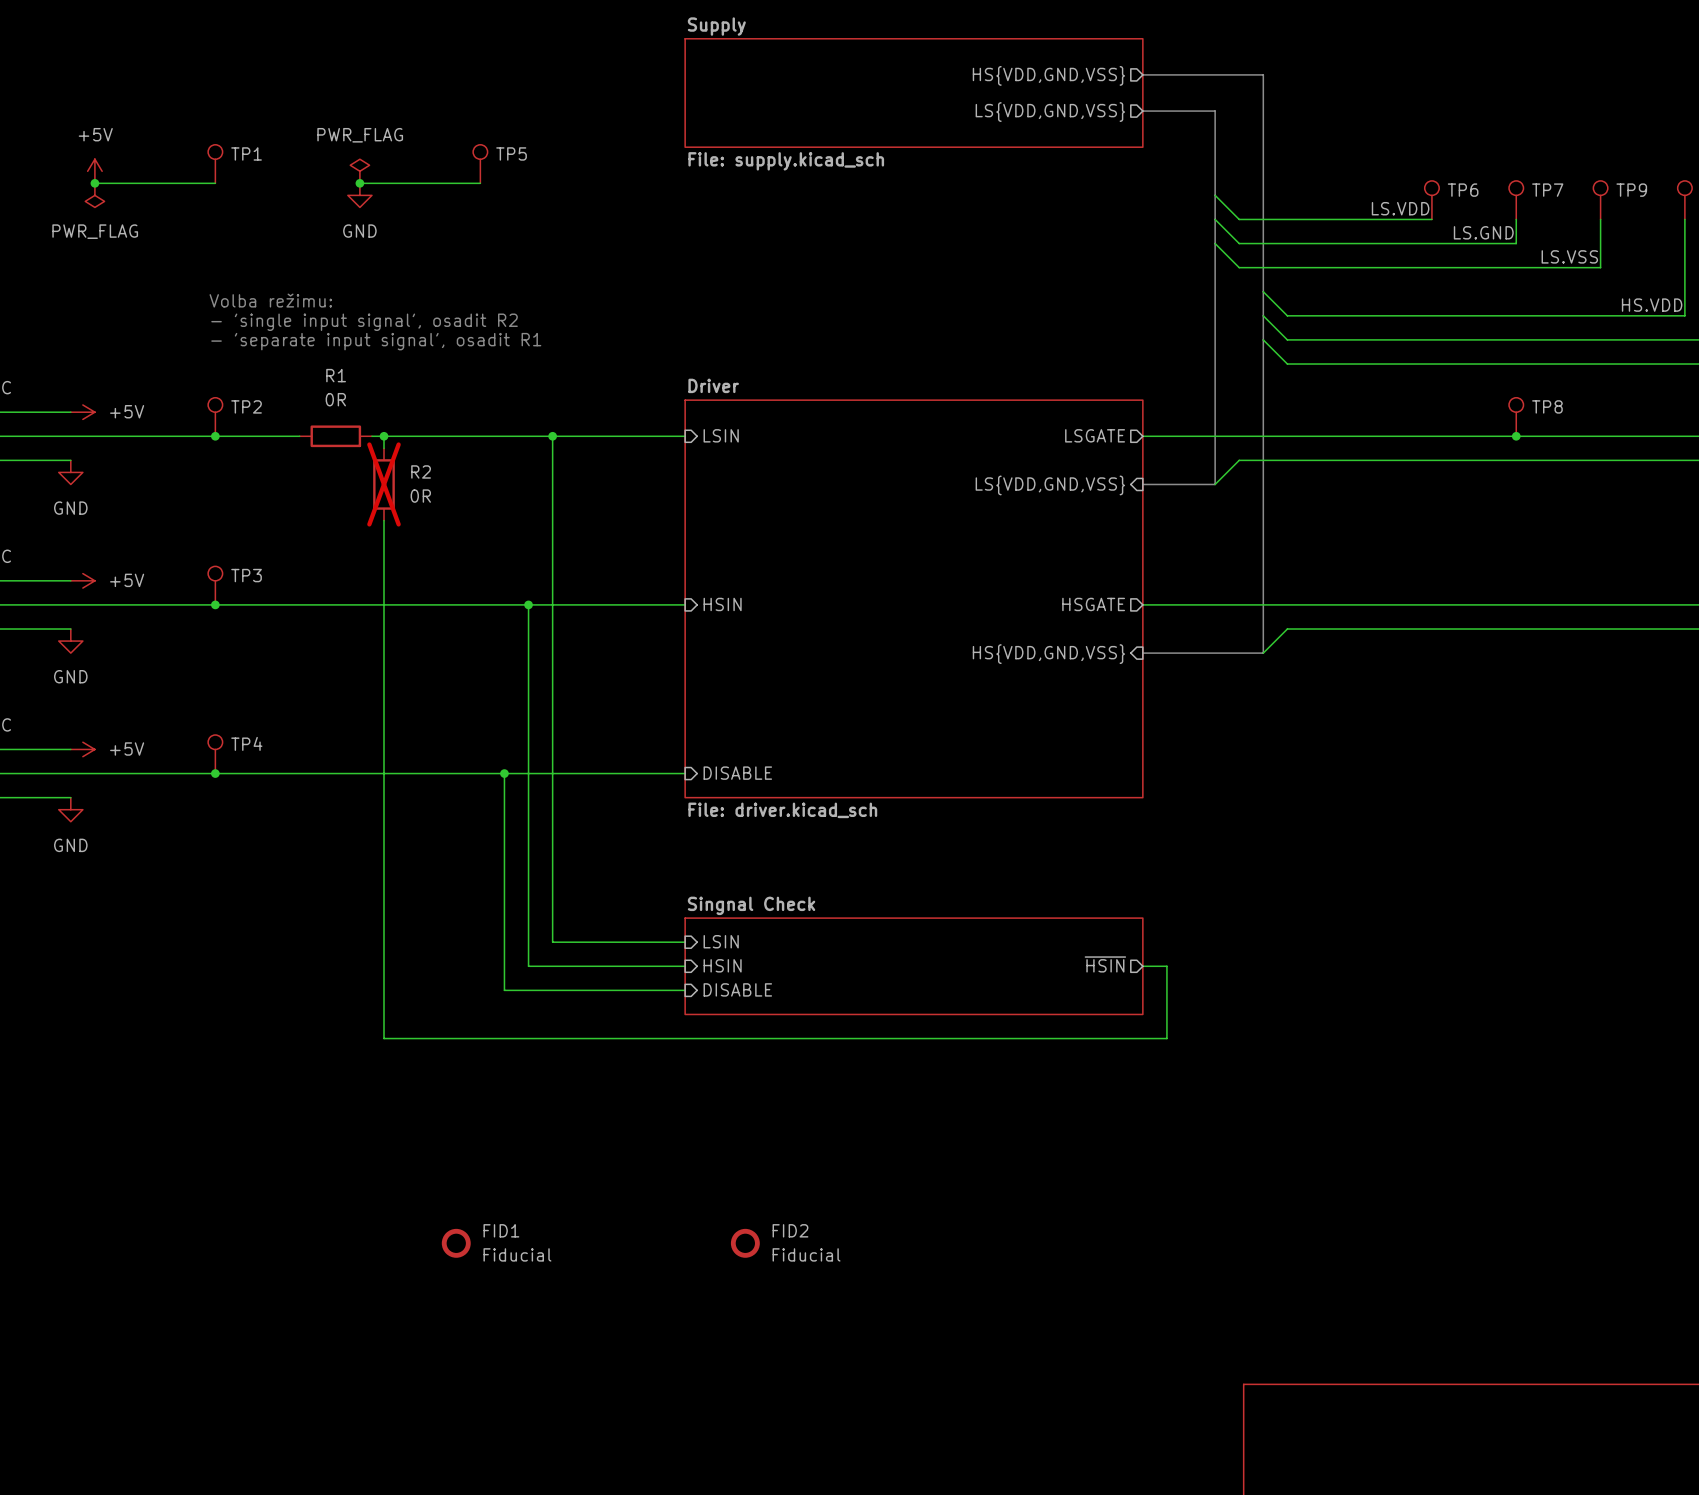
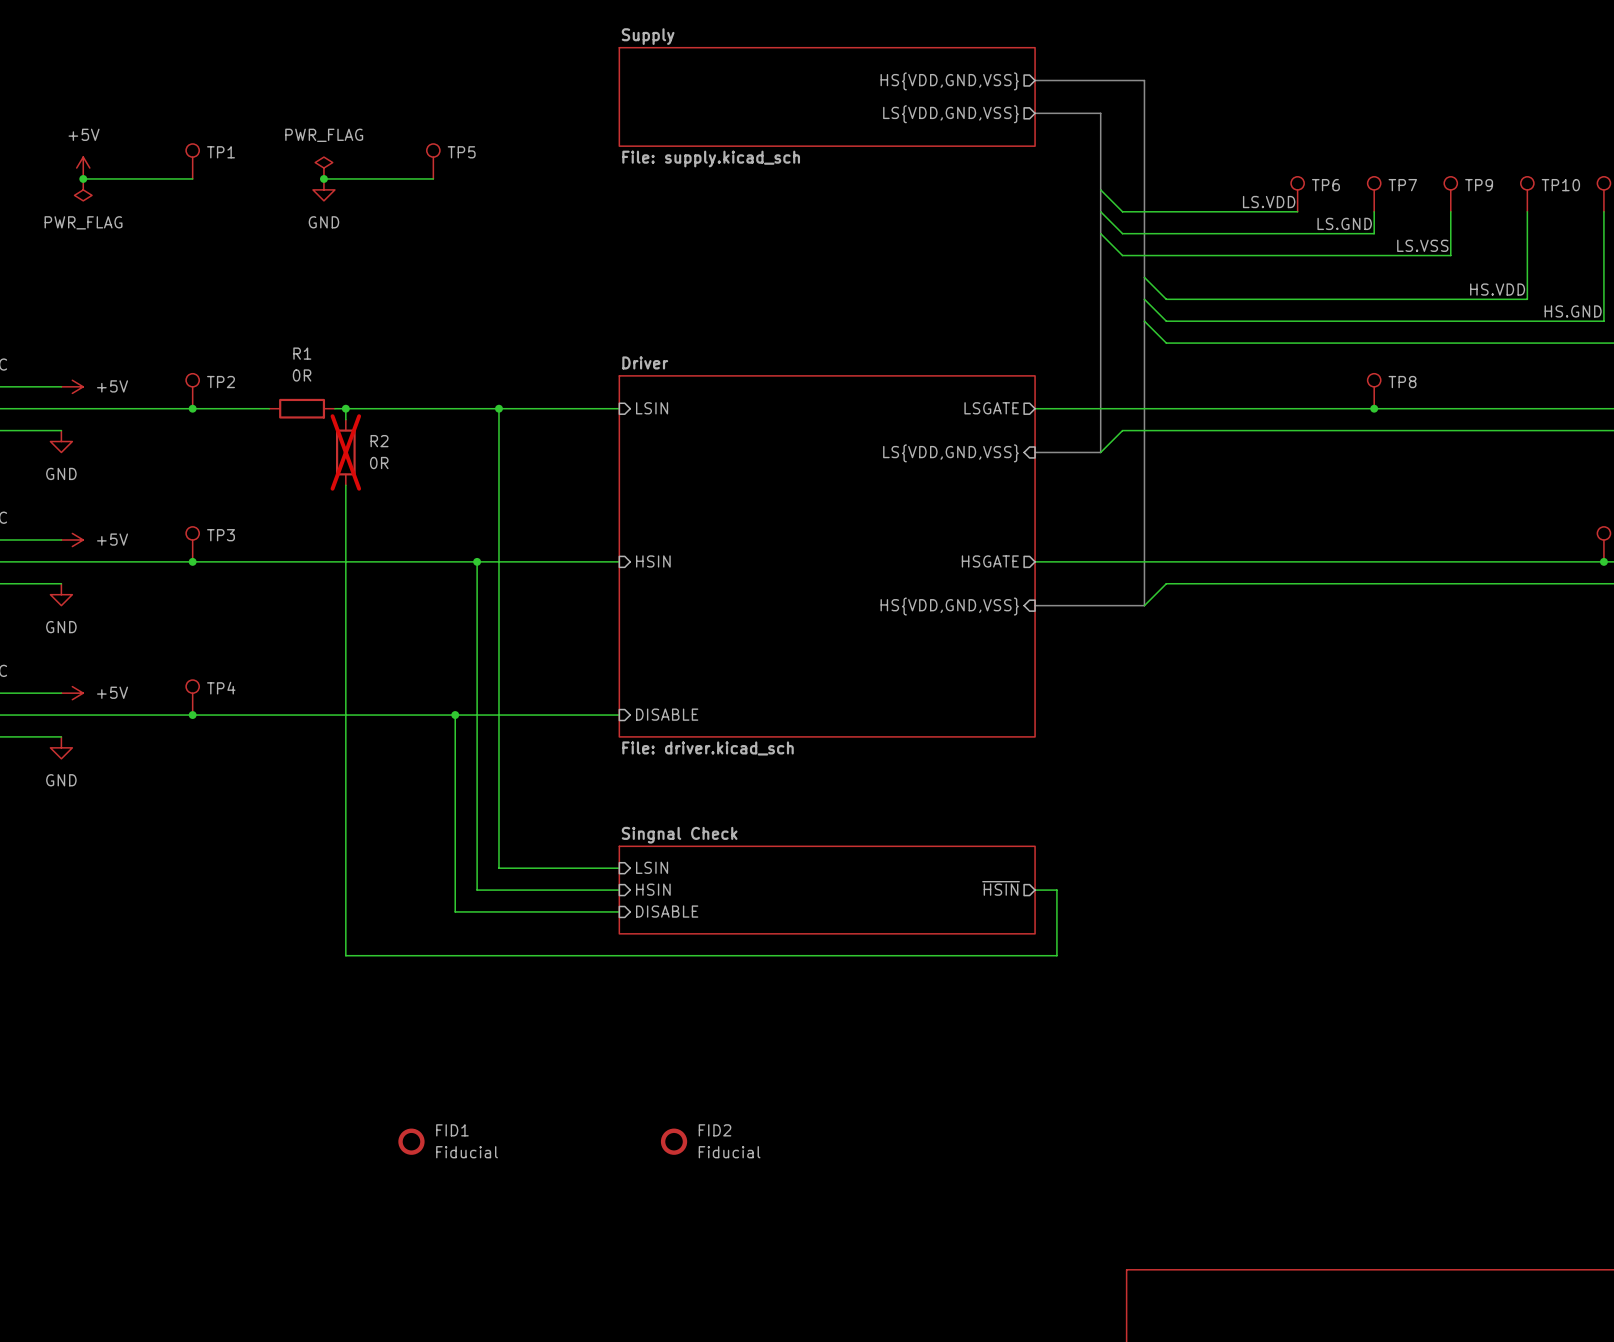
text: Volba režimu: (270, 300) -> none
text: - 'single input signal', osadit R2 (364, 322) -> none
text: - 'separate input signal', osadit R1 (376, 341) -> none

